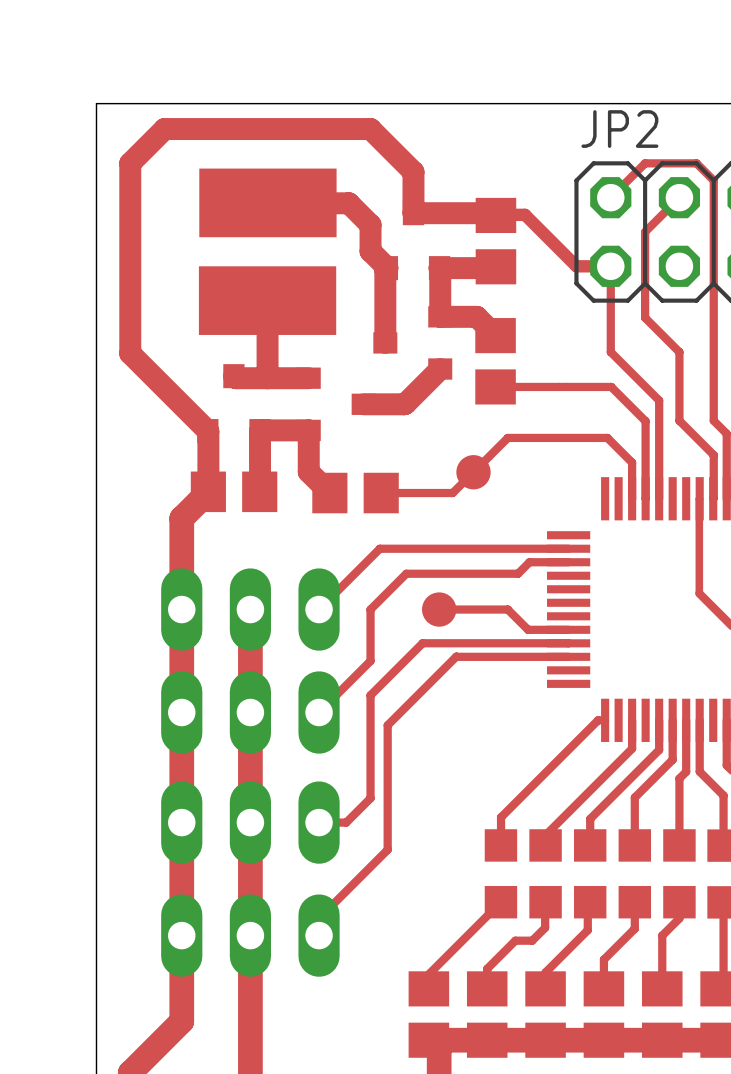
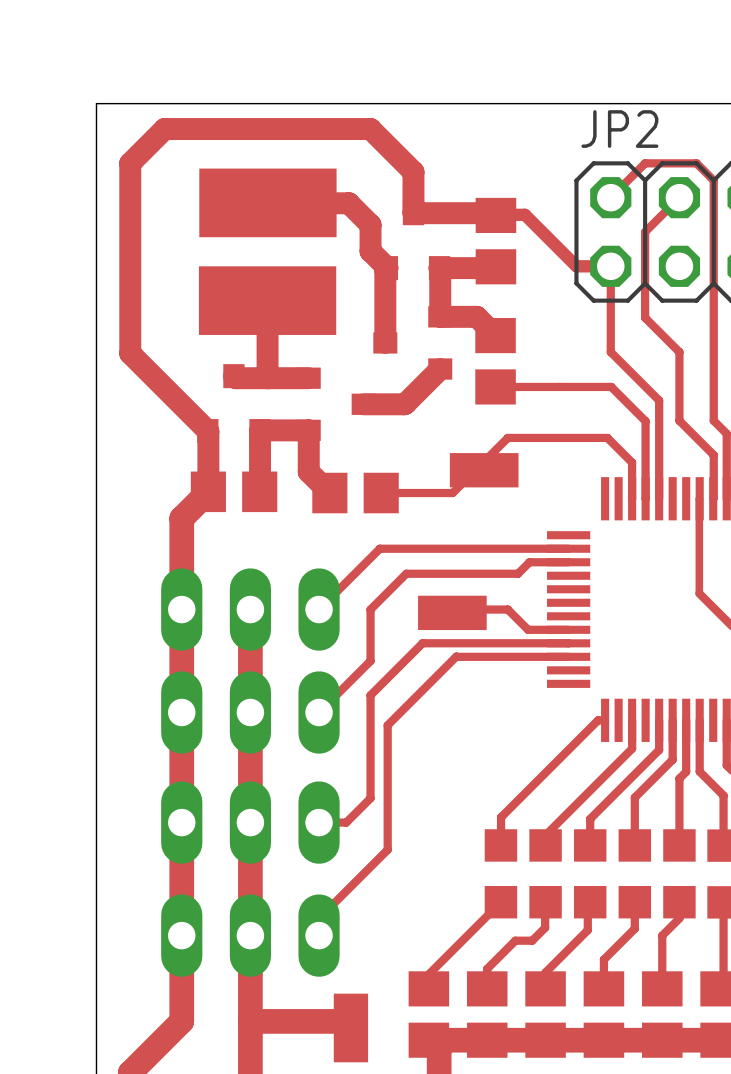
part footprint: [456, 455, 491, 490] -> [449, 453, 519, 488]
part footprint: [422, 592, 457, 627] -> [418, 595, 487, 631]
top track: none -> (250, 1021) (344, 1021) (350, 1027)
part: none -> (350, 1027)

